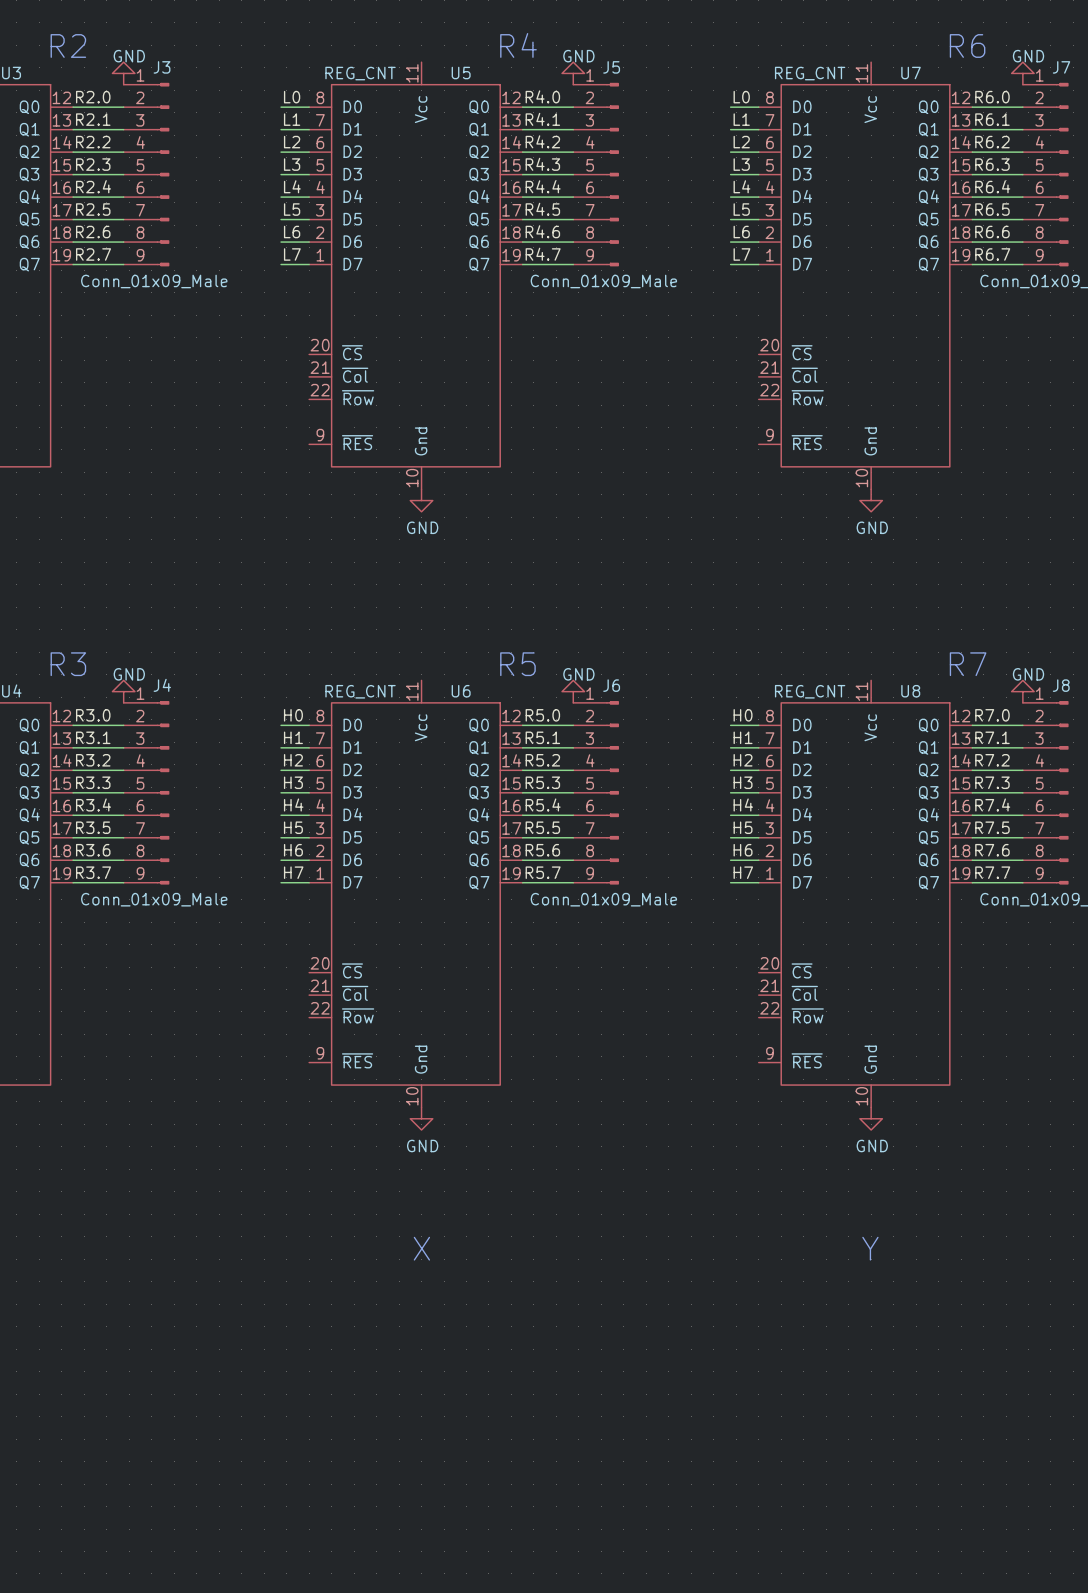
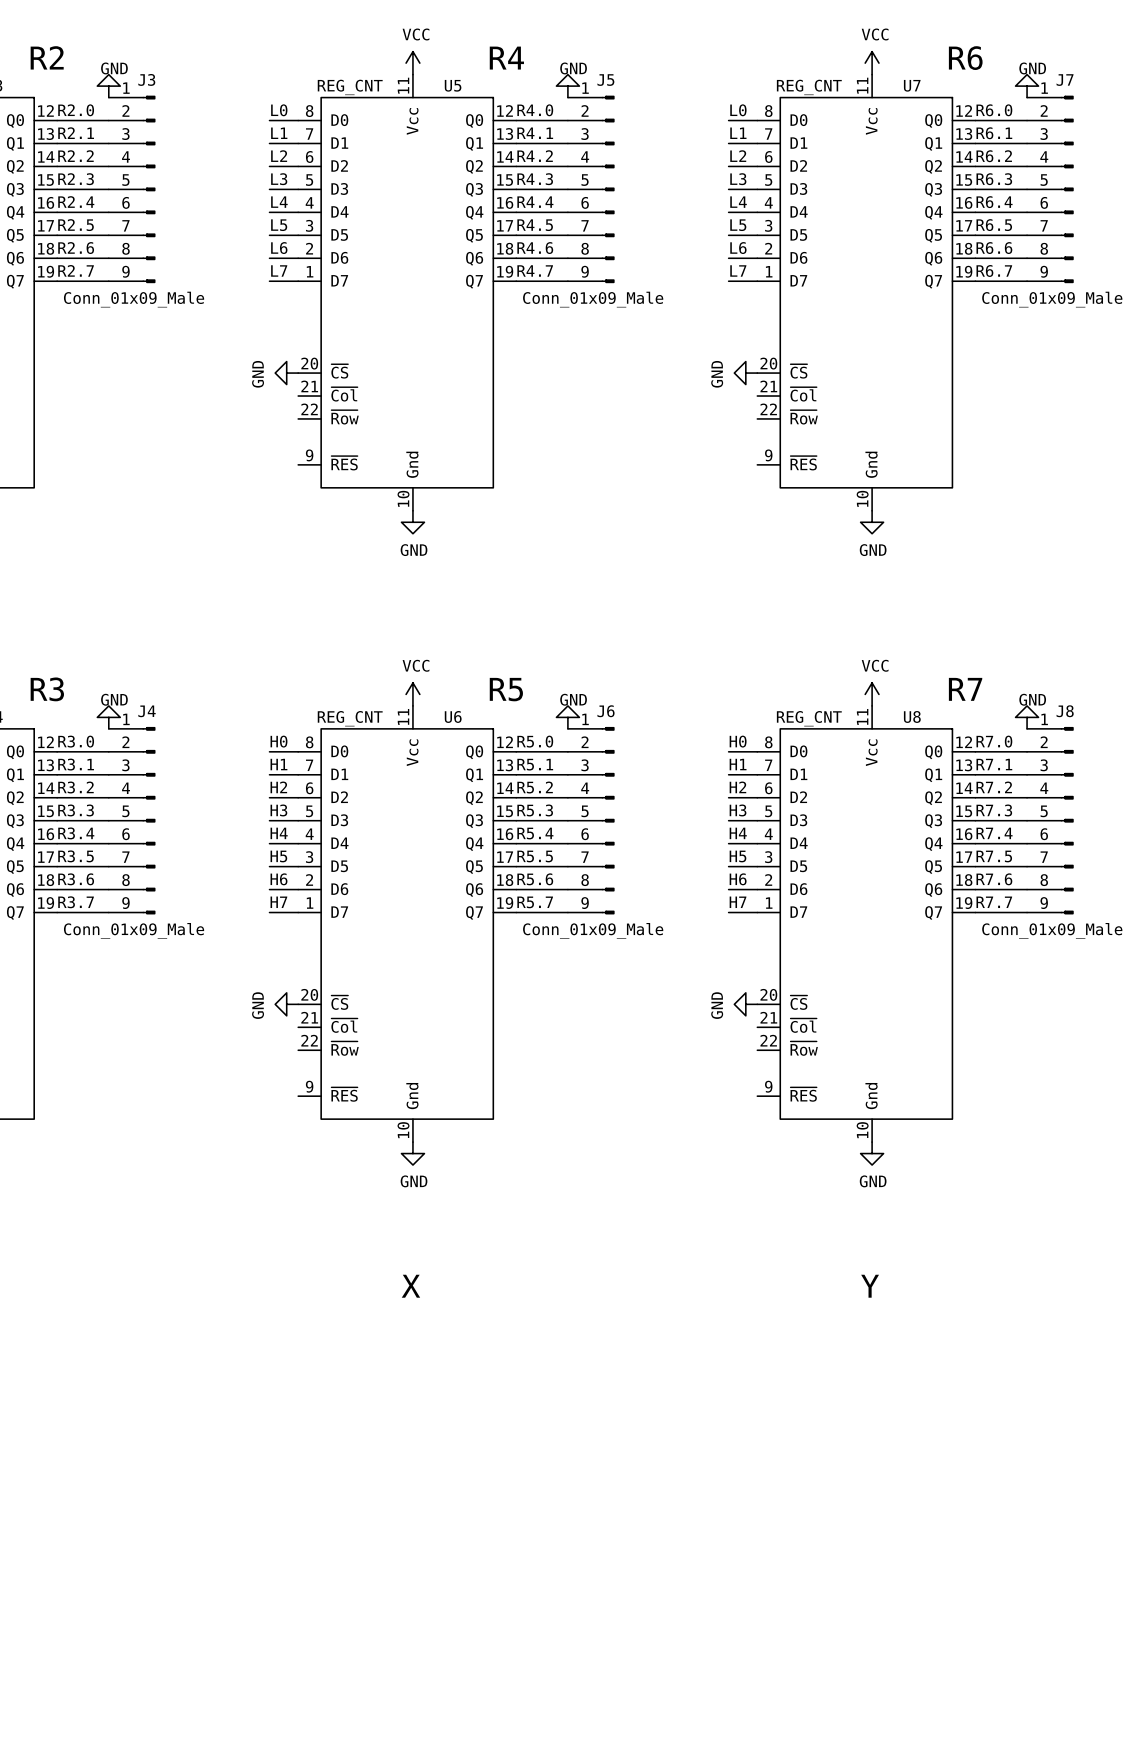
power symbol: none -> VCC (412, 63)
power symbol: none -> VCC (872, 63)
power symbol: none -> GND (286, 373)
power symbol: none -> GND (745, 373)
power symbol: none -> VCC (412, 694)
power symbol: none -> VCC (872, 694)
power symbol: none -> GND (286, 1004)
power symbol: none -> GND (745, 1004)

